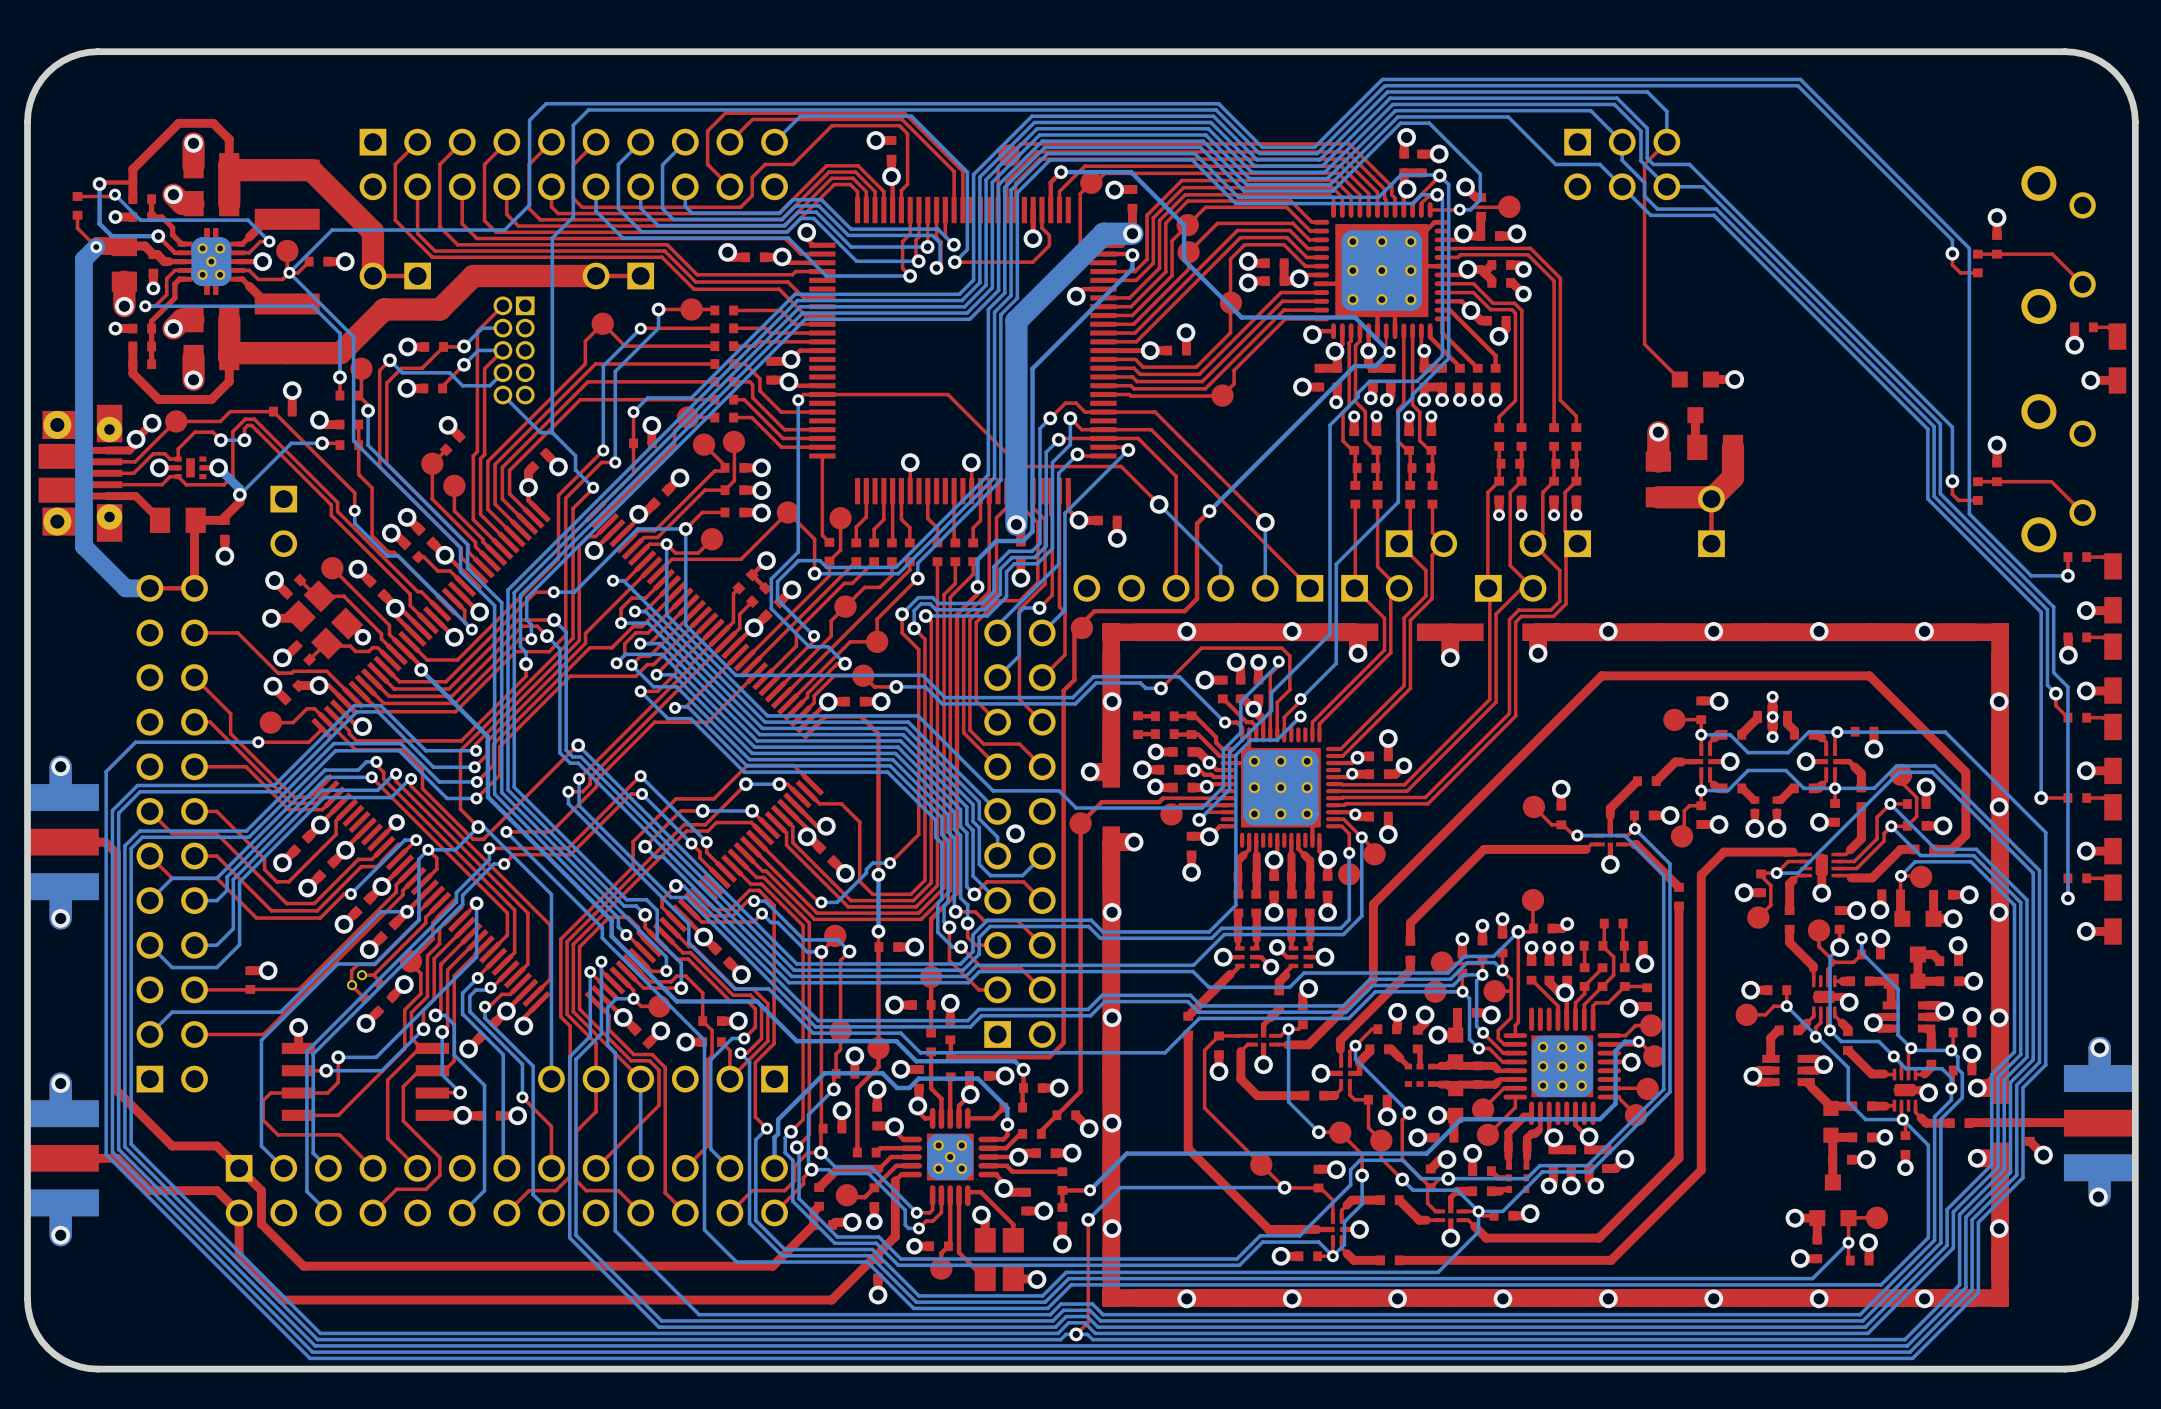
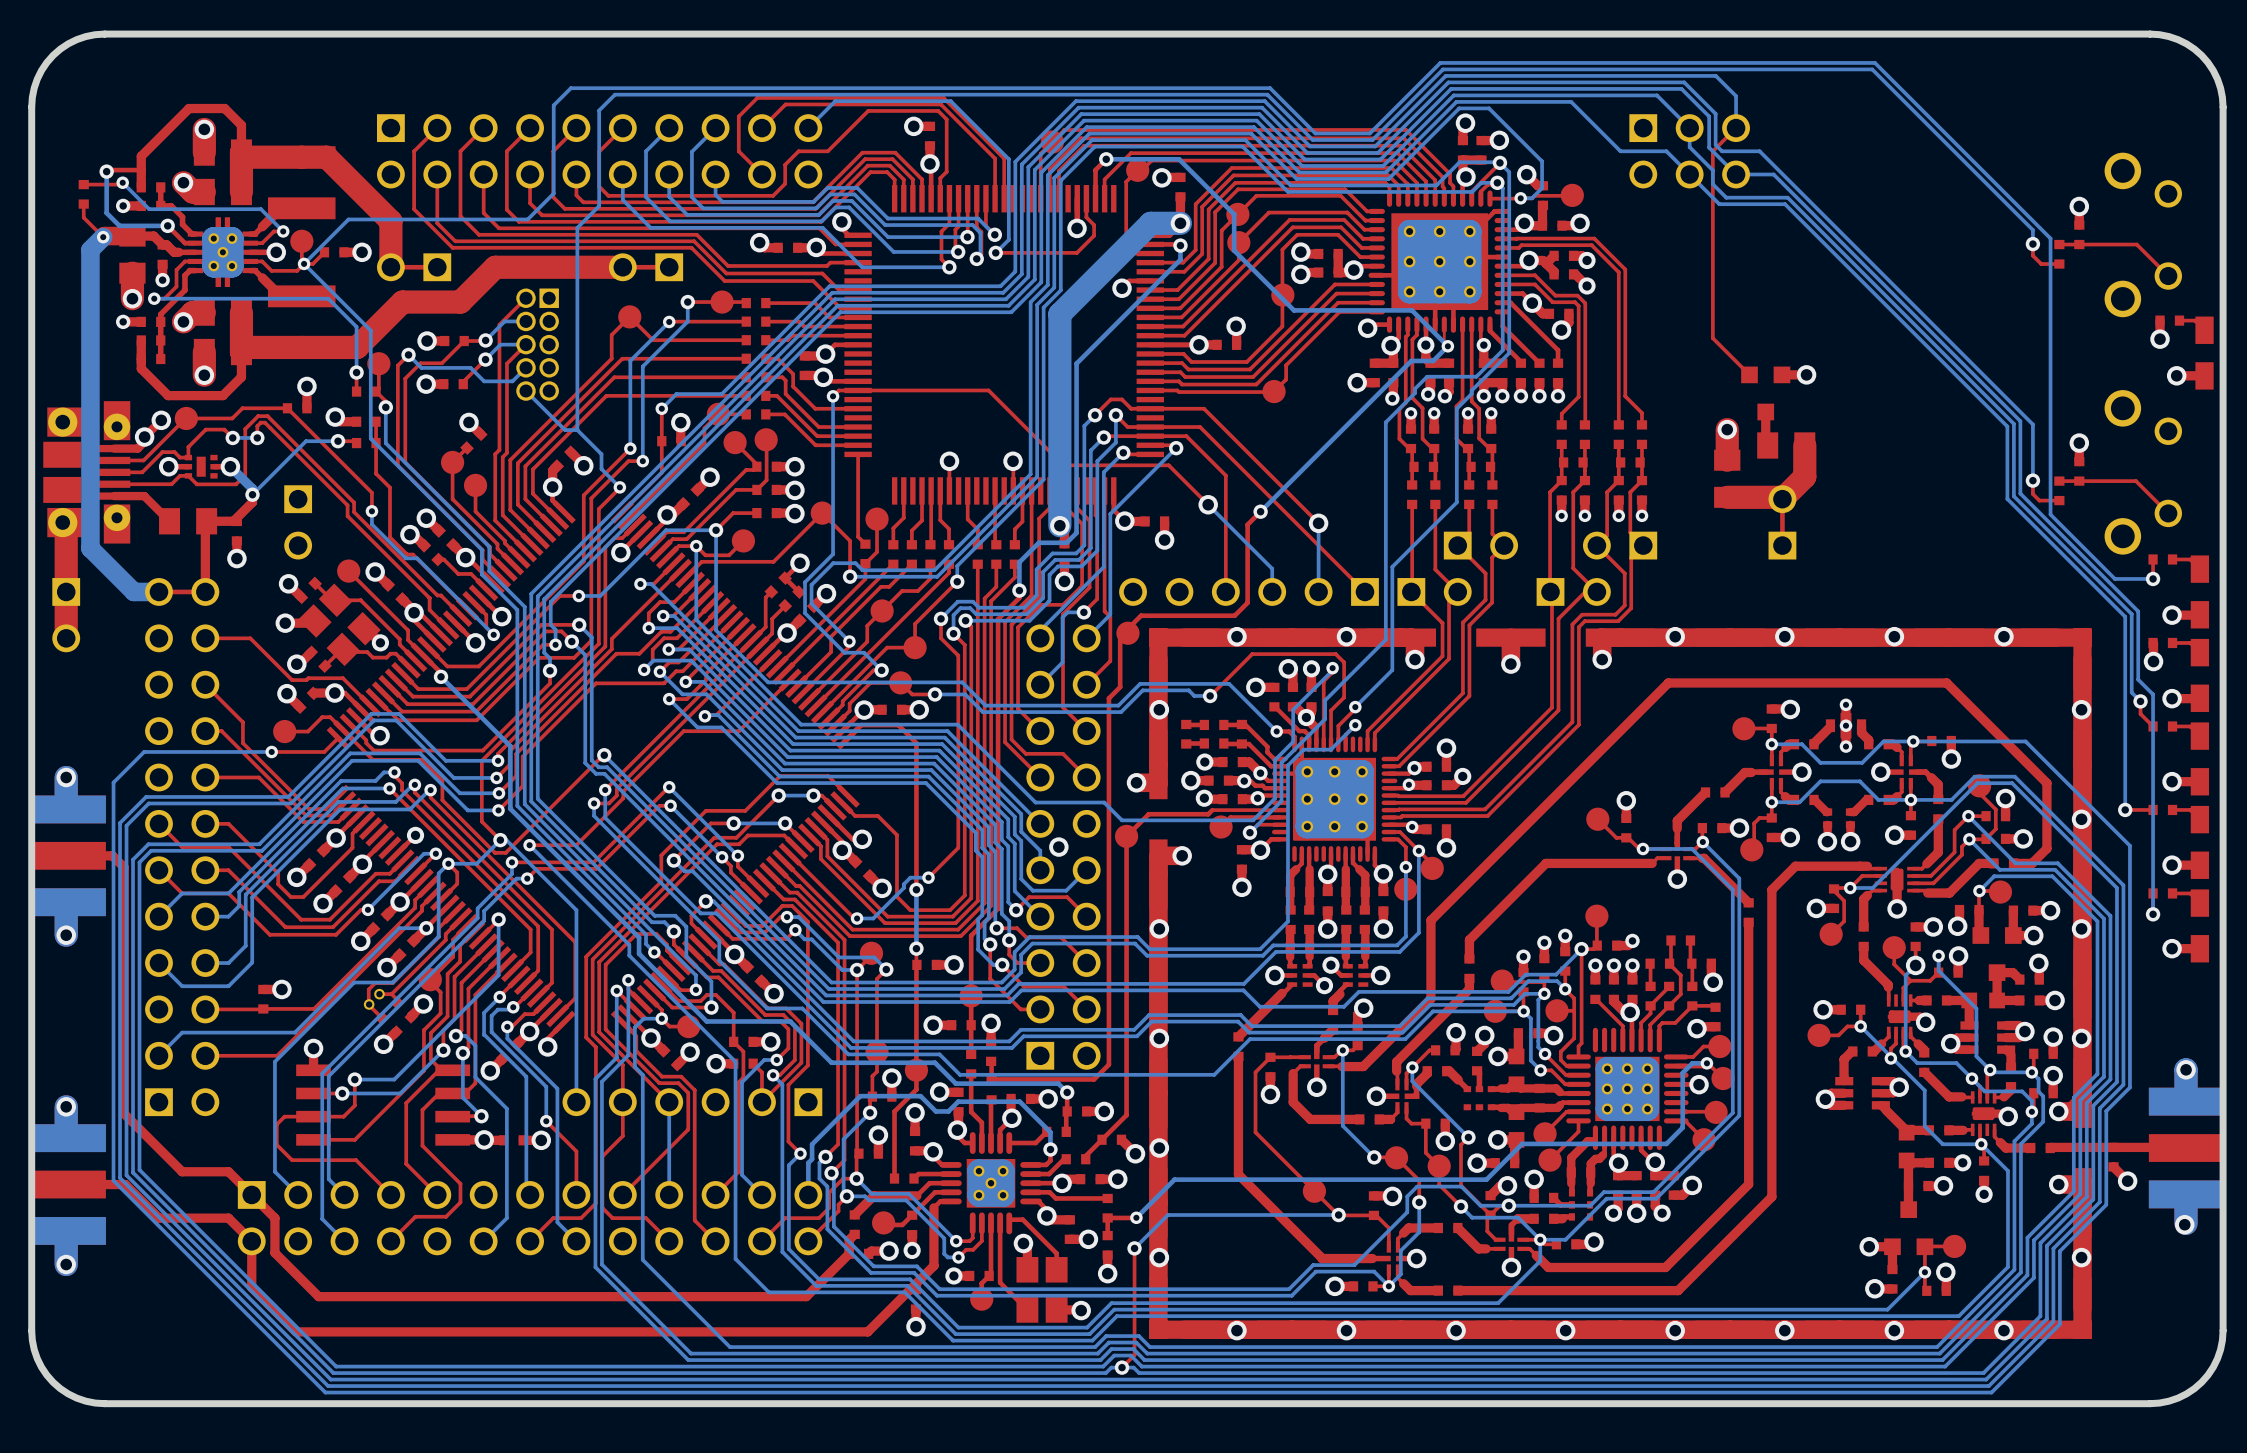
top track: none -> (73, 522) (66, 529) (66, 638)
part: none -> (66, 615)

